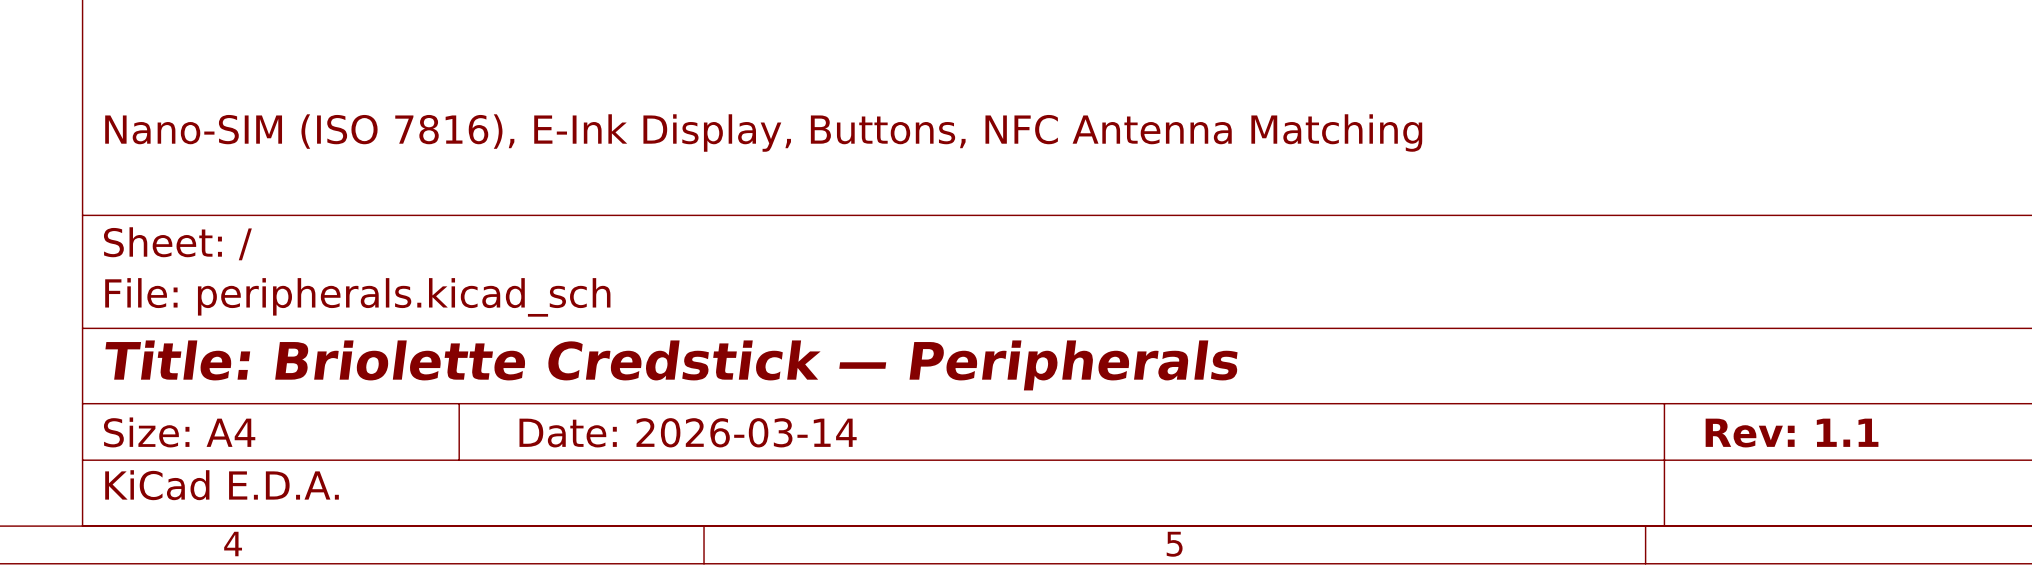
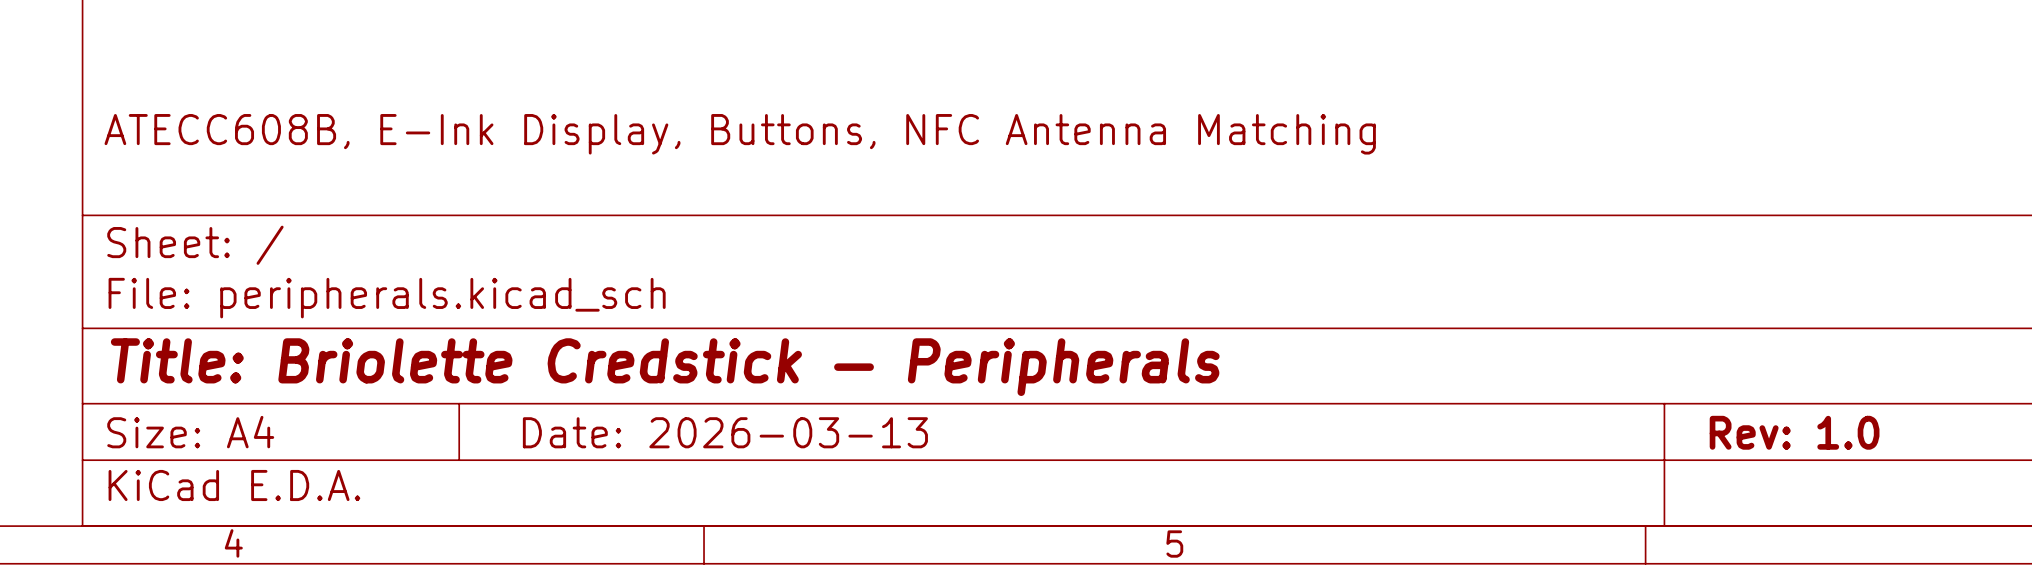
title block: Nano-SIM (ISO 7816), E-Ink Display, Buttons, NFC Antenna Matching (763, 133) -> ATECC608B, E-Ink Display, Buttons, NFC Antenna Matching (740, 134)
title block: Date: 2026-03-14 (688, 432) -> Date: 2026-03-13 (725, 432)
title block: Rev: 1.1 (1792, 433) -> Rev: 1.0 (1794, 432)

